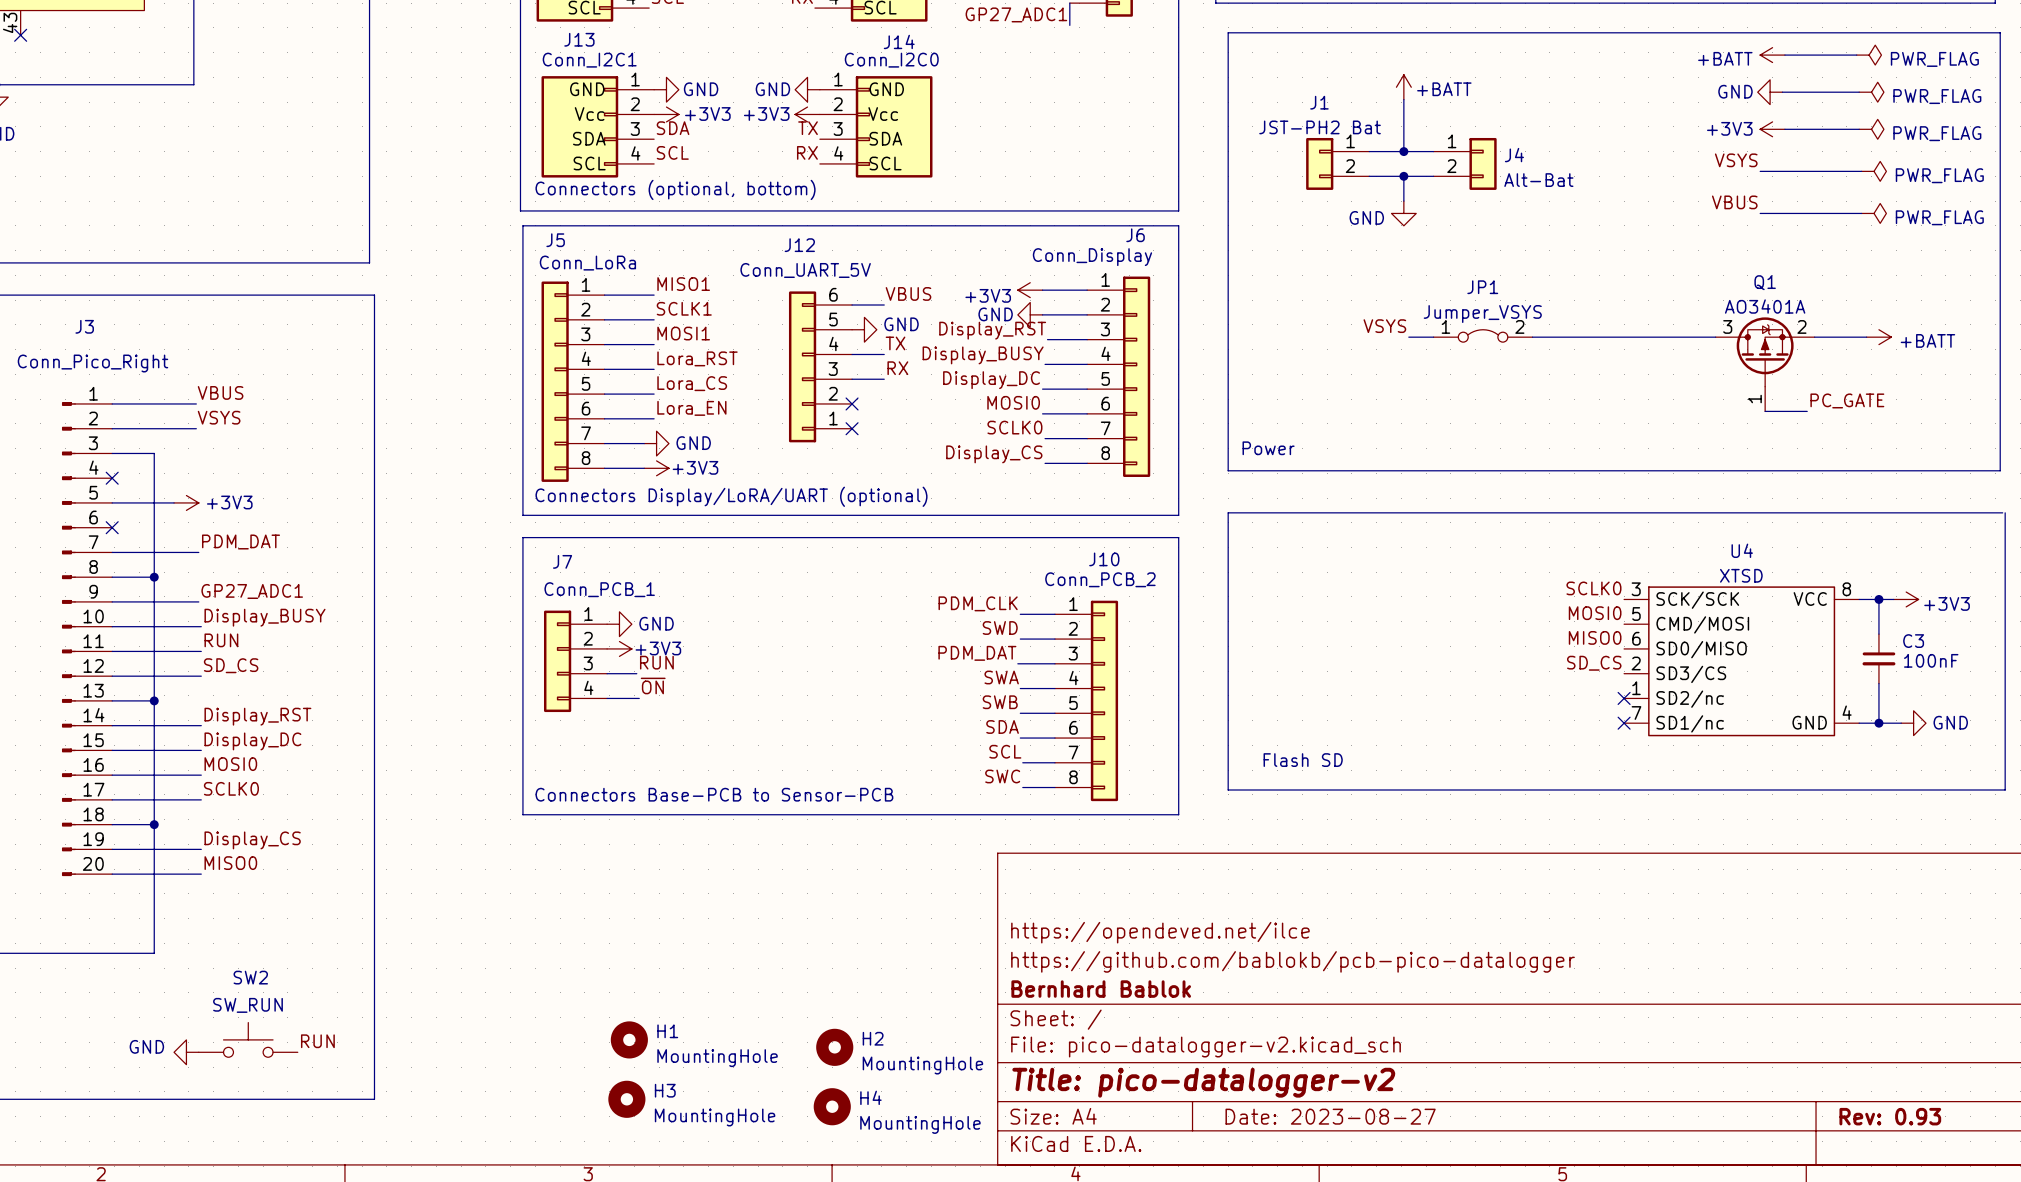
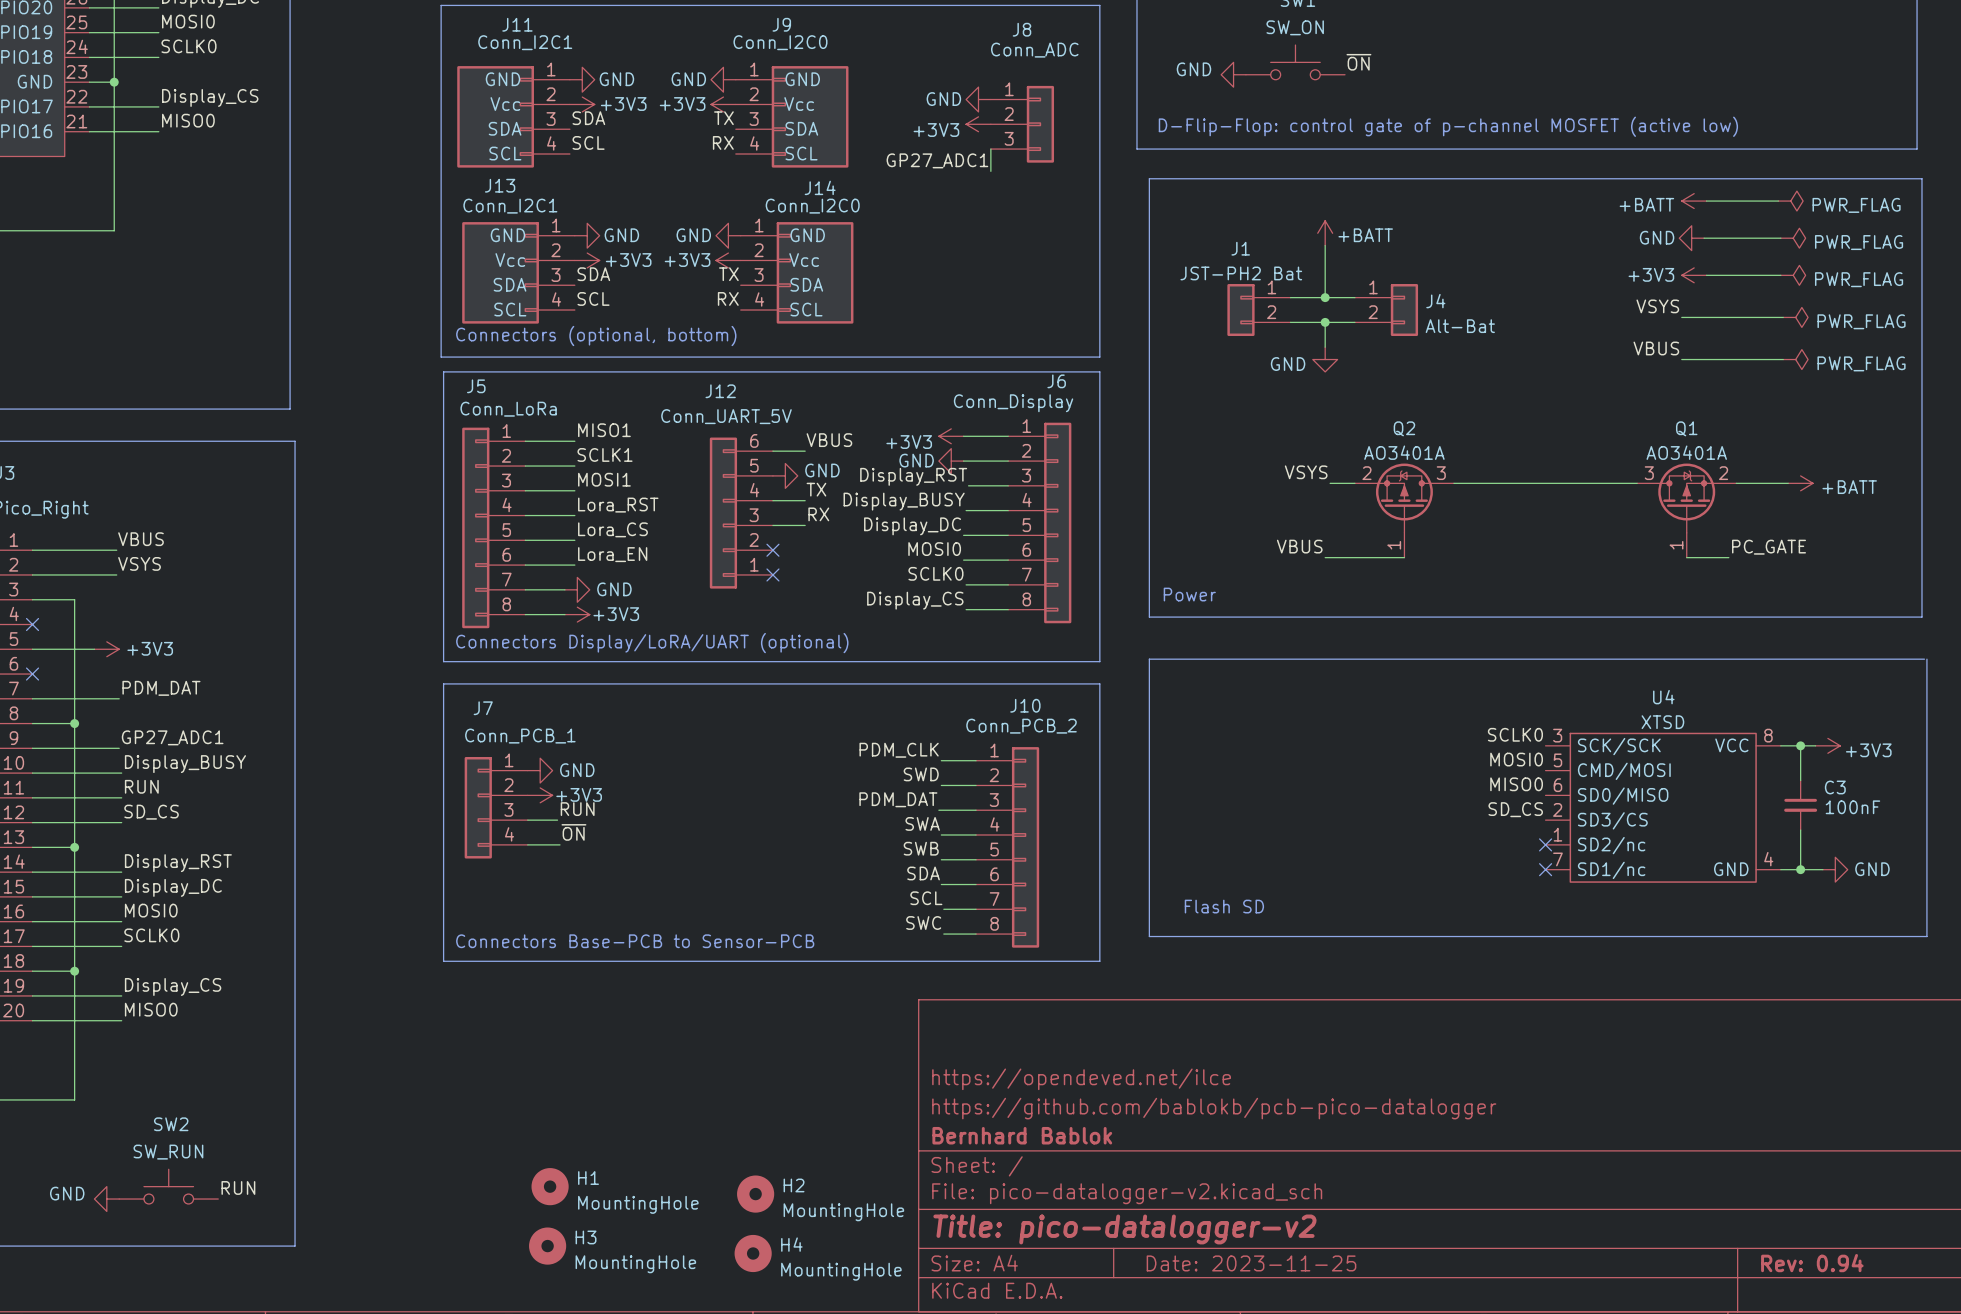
JP1: Jumper_VSYS (1483, 335) -> none
Q2: none -> AO3401A (1404, 510)
label: none -> VBUS (1299, 546)
wire: none -> (1325, 557) (1404, 557)
title block: Date: 2023-08-27 (1330, 1116) -> Date: 2023-11-25 (1251, 1263)
title block: Rev: 0.93 (1890, 1116) -> Rev: 0.94 (1812, 1263)

